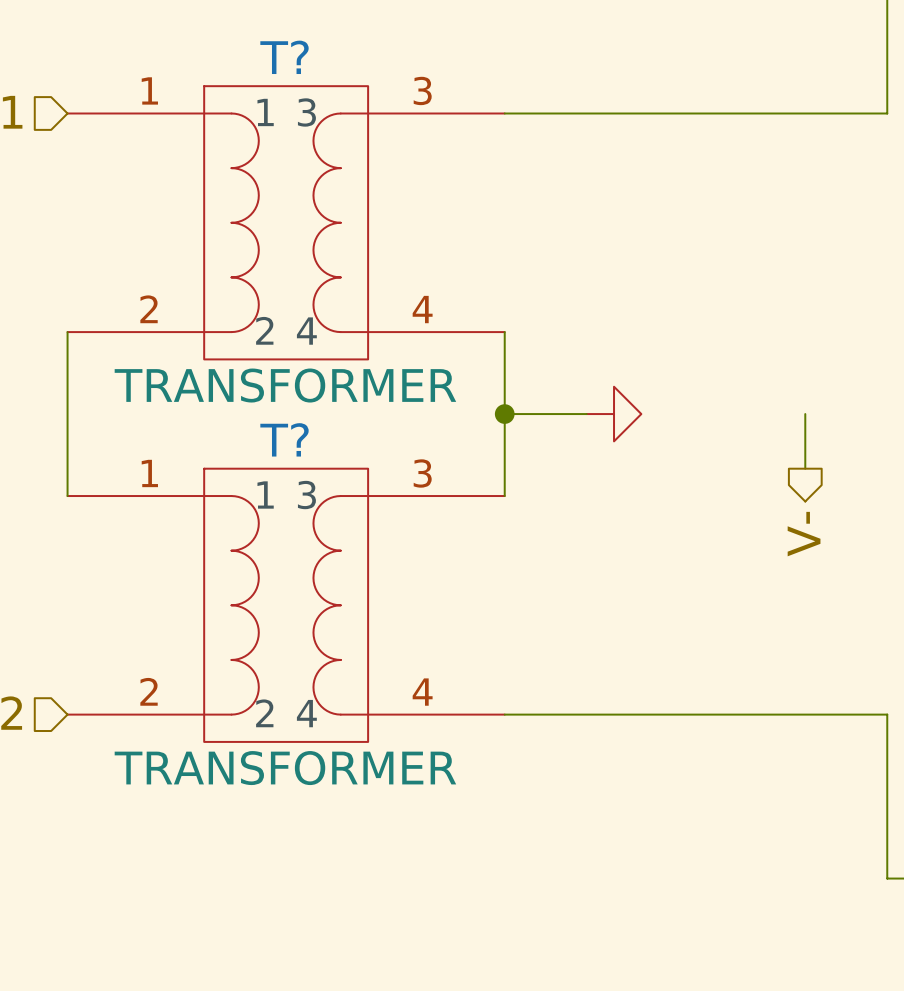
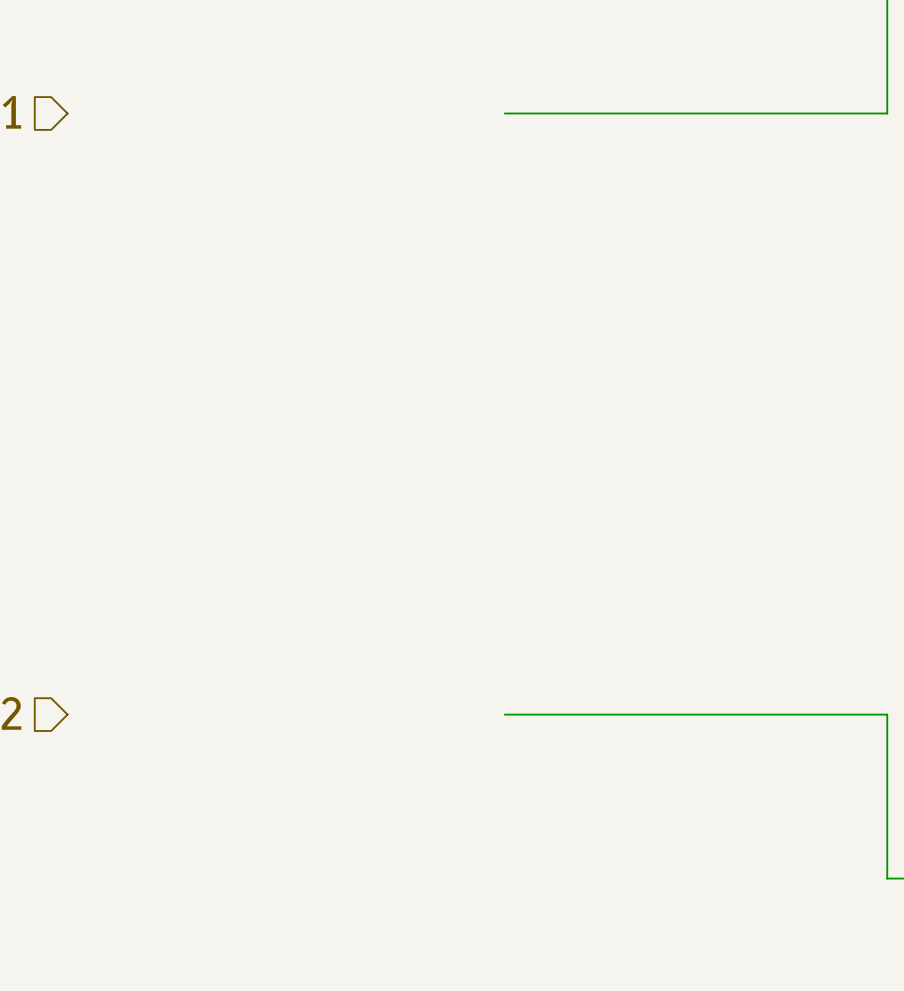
T?: TRANSFORMER (286, 222) -> none
wire: (67, 332) (67, 496) -> none
wire: (504, 332) (504, 496) -> none
wire: (504, 414) (586, 414) -> none
junction: (504, 414) -> none
power symbol: (614, 414) -> none
wire: (805, 414) (805, 468) -> none
hierarchical label: V- (804, 534) -> none
T?: TRANSFORMER (286, 605) -> none

